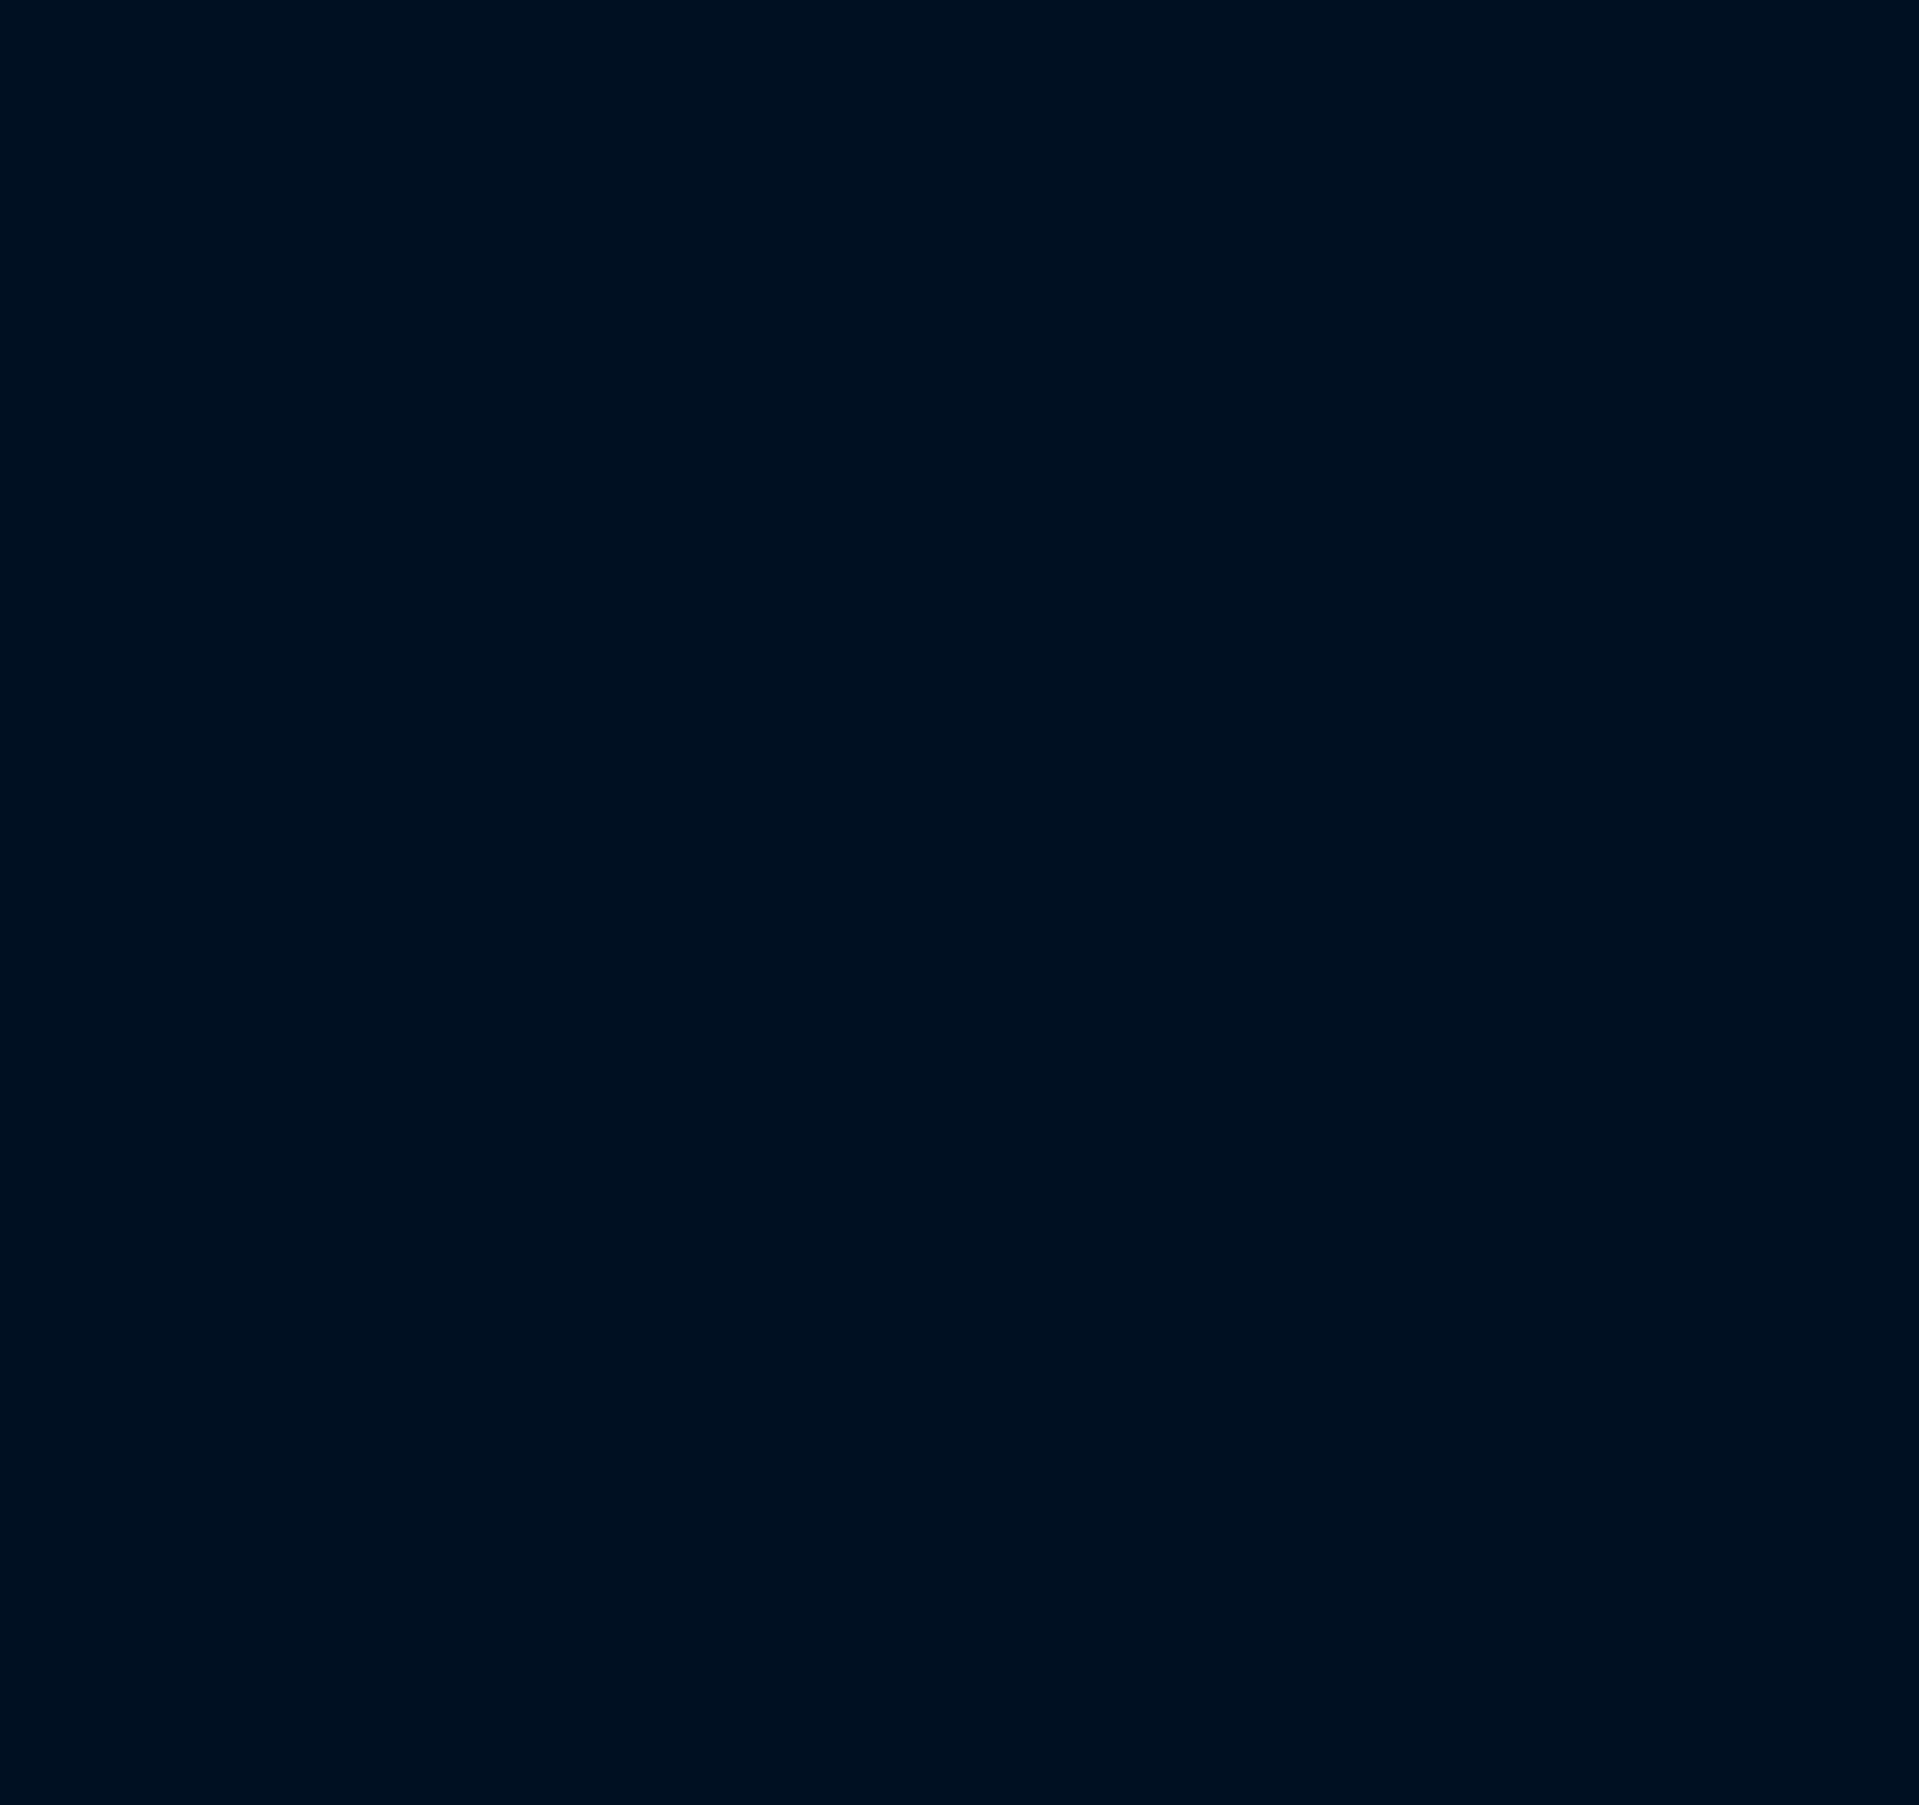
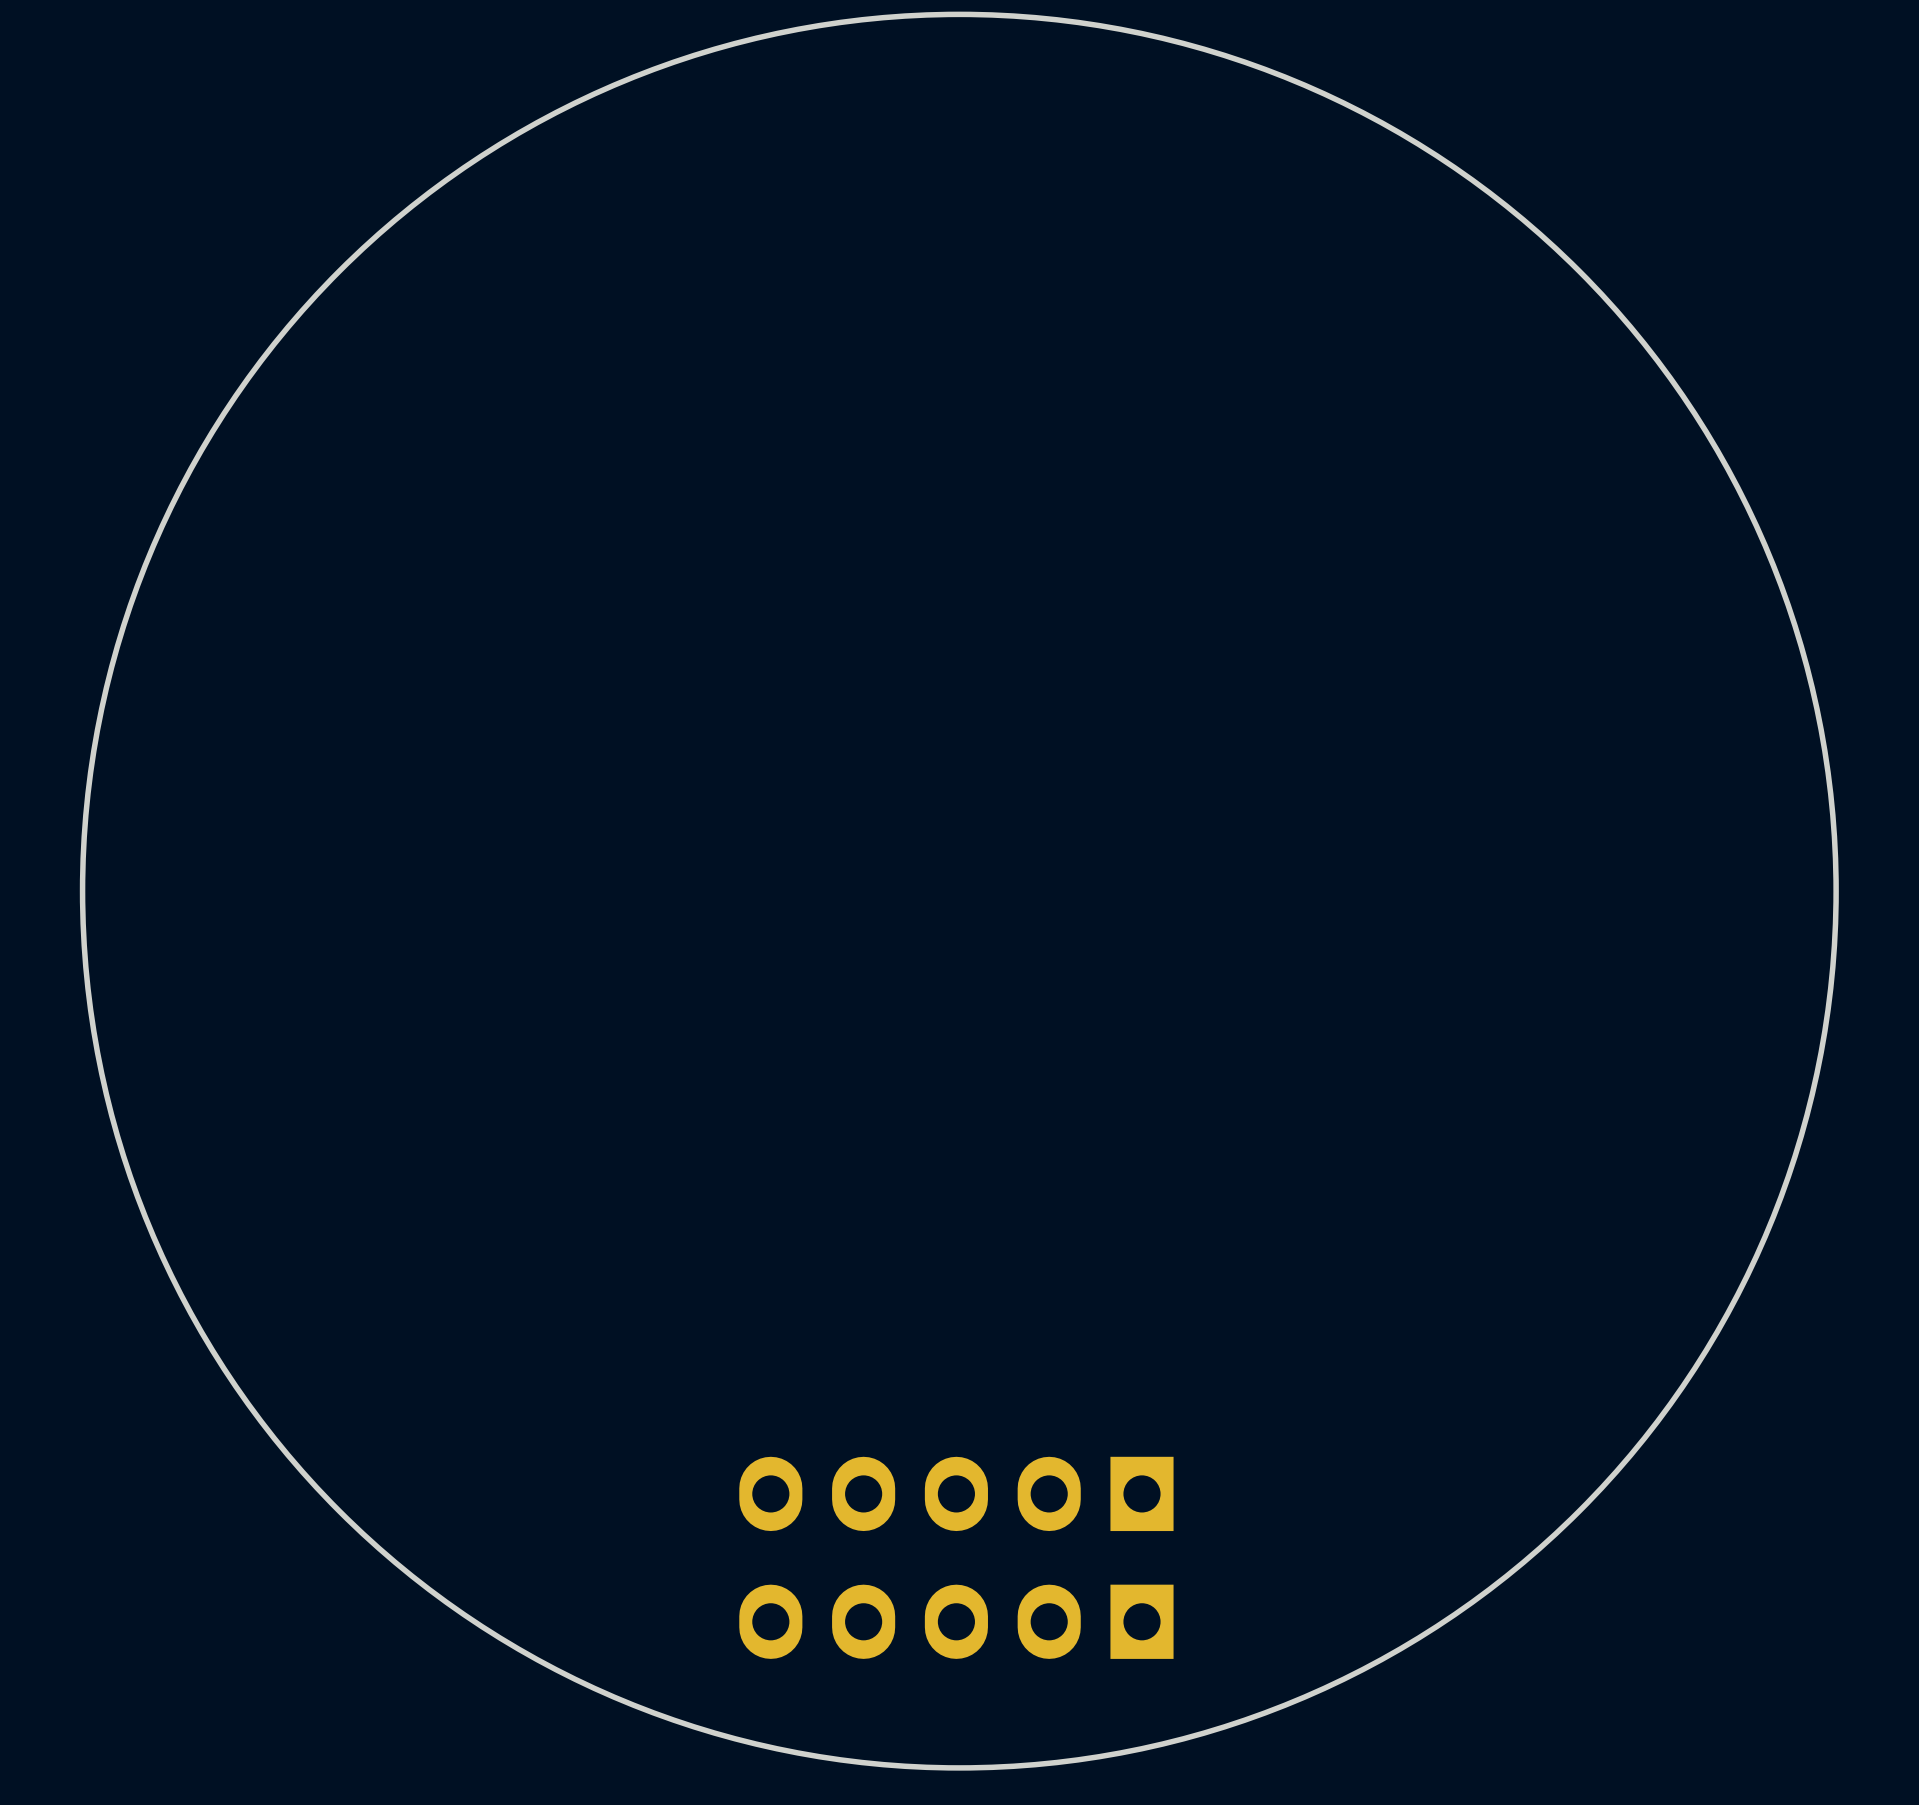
round board edge: none -> [79, 11, 1839, 1771]
part: none -> (956, 1493)
part: none -> (956, 1621)

